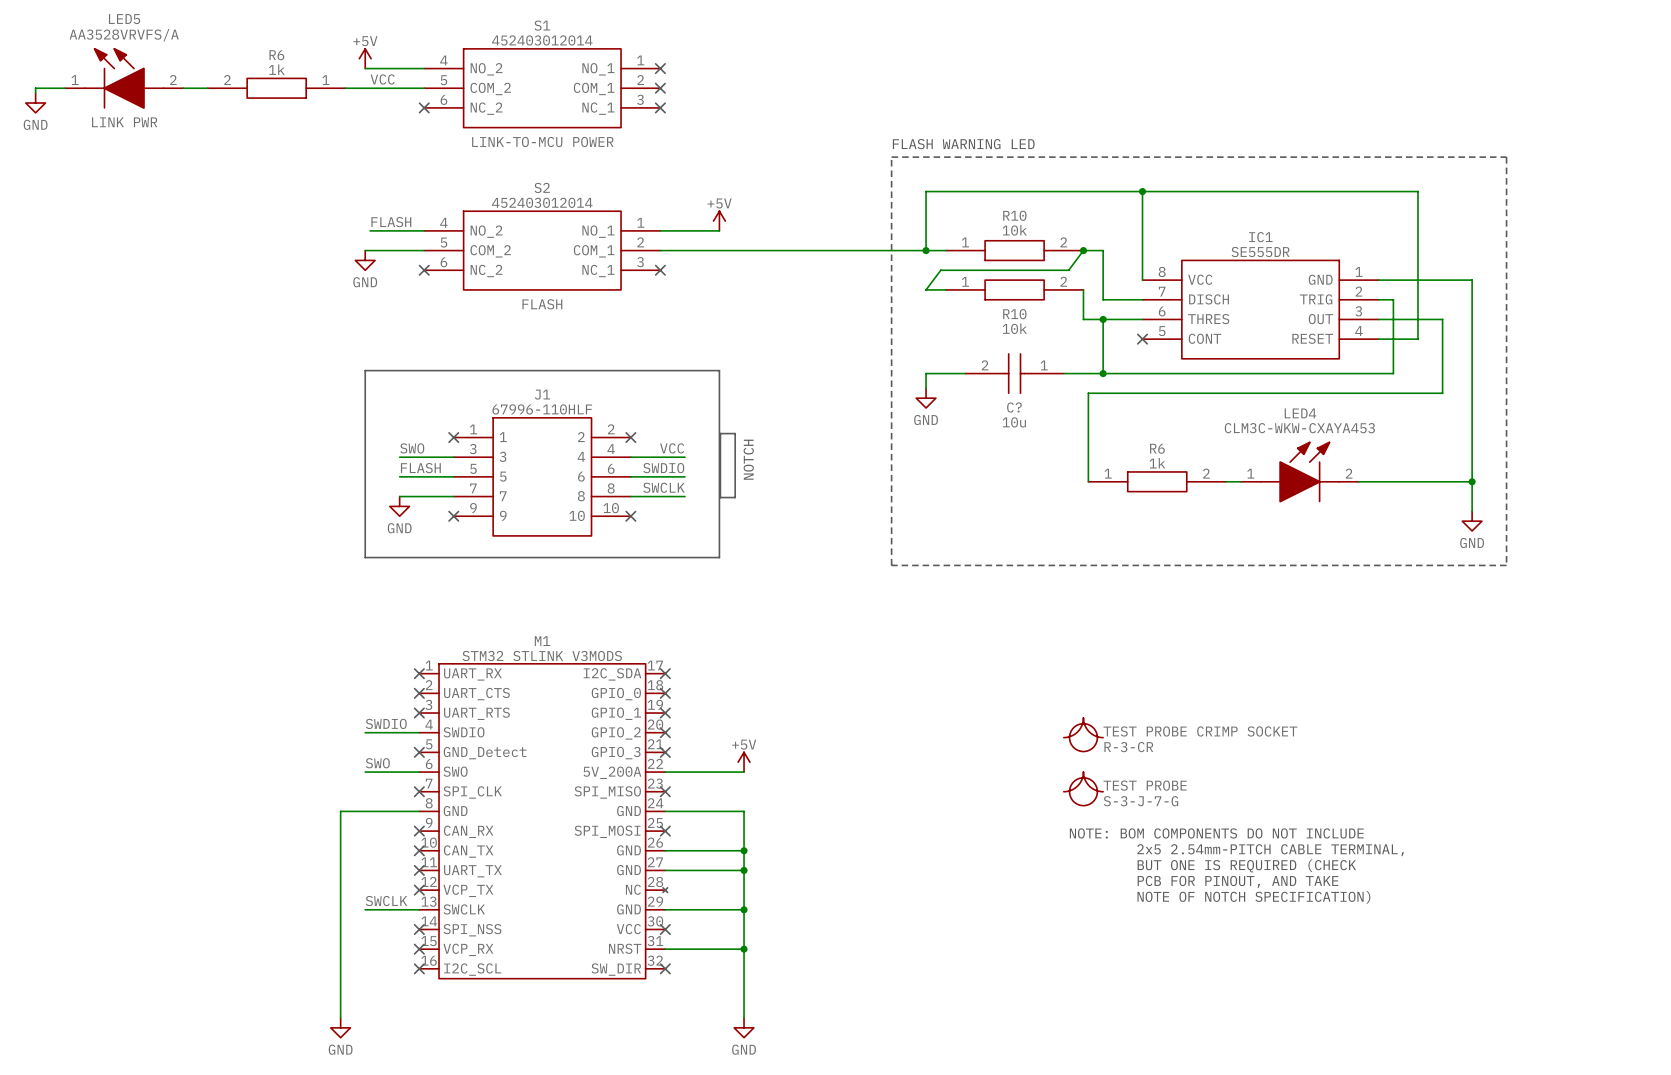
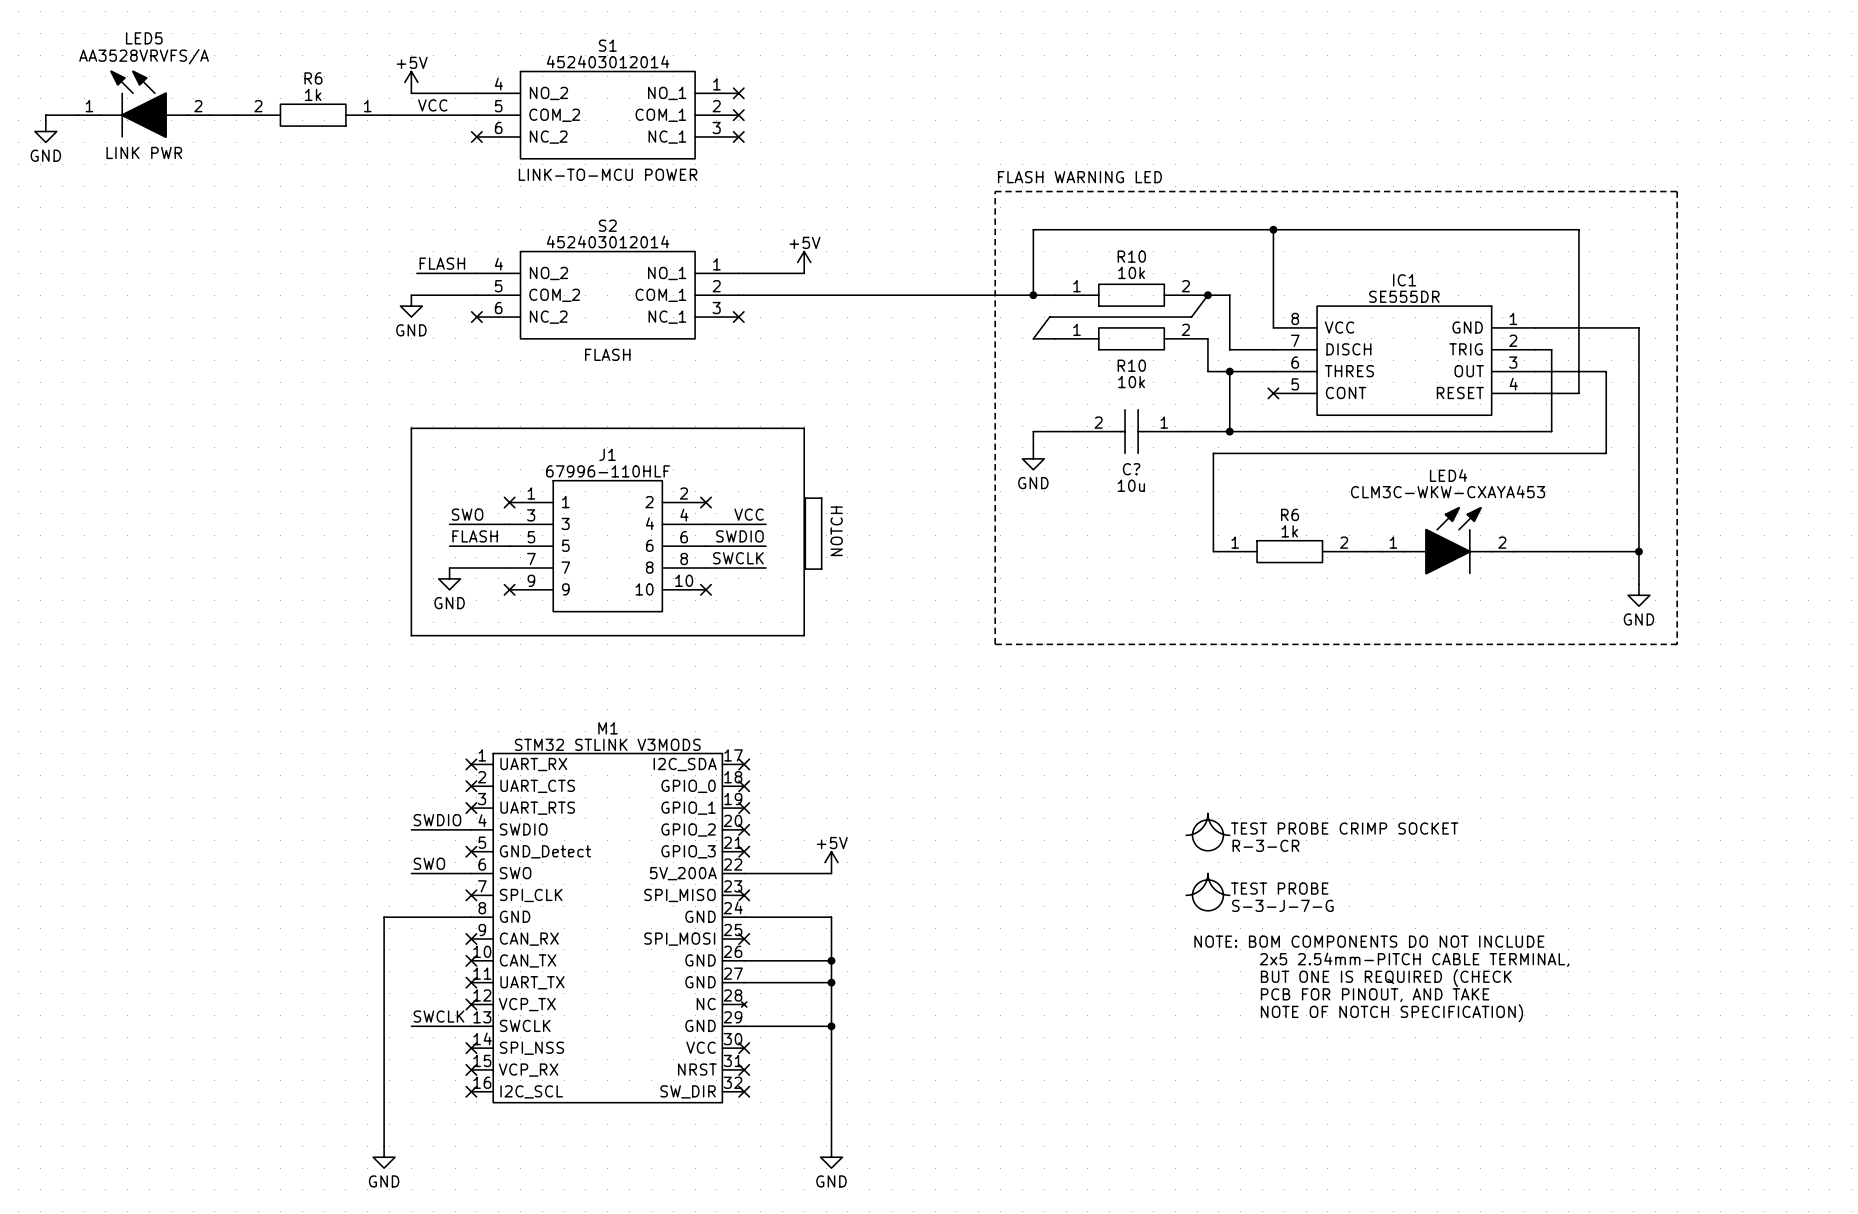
wire: (665, 949) (744, 949) -> none
no-connect mark: none -> (744, 1069)
junction: (744, 949) -> none

